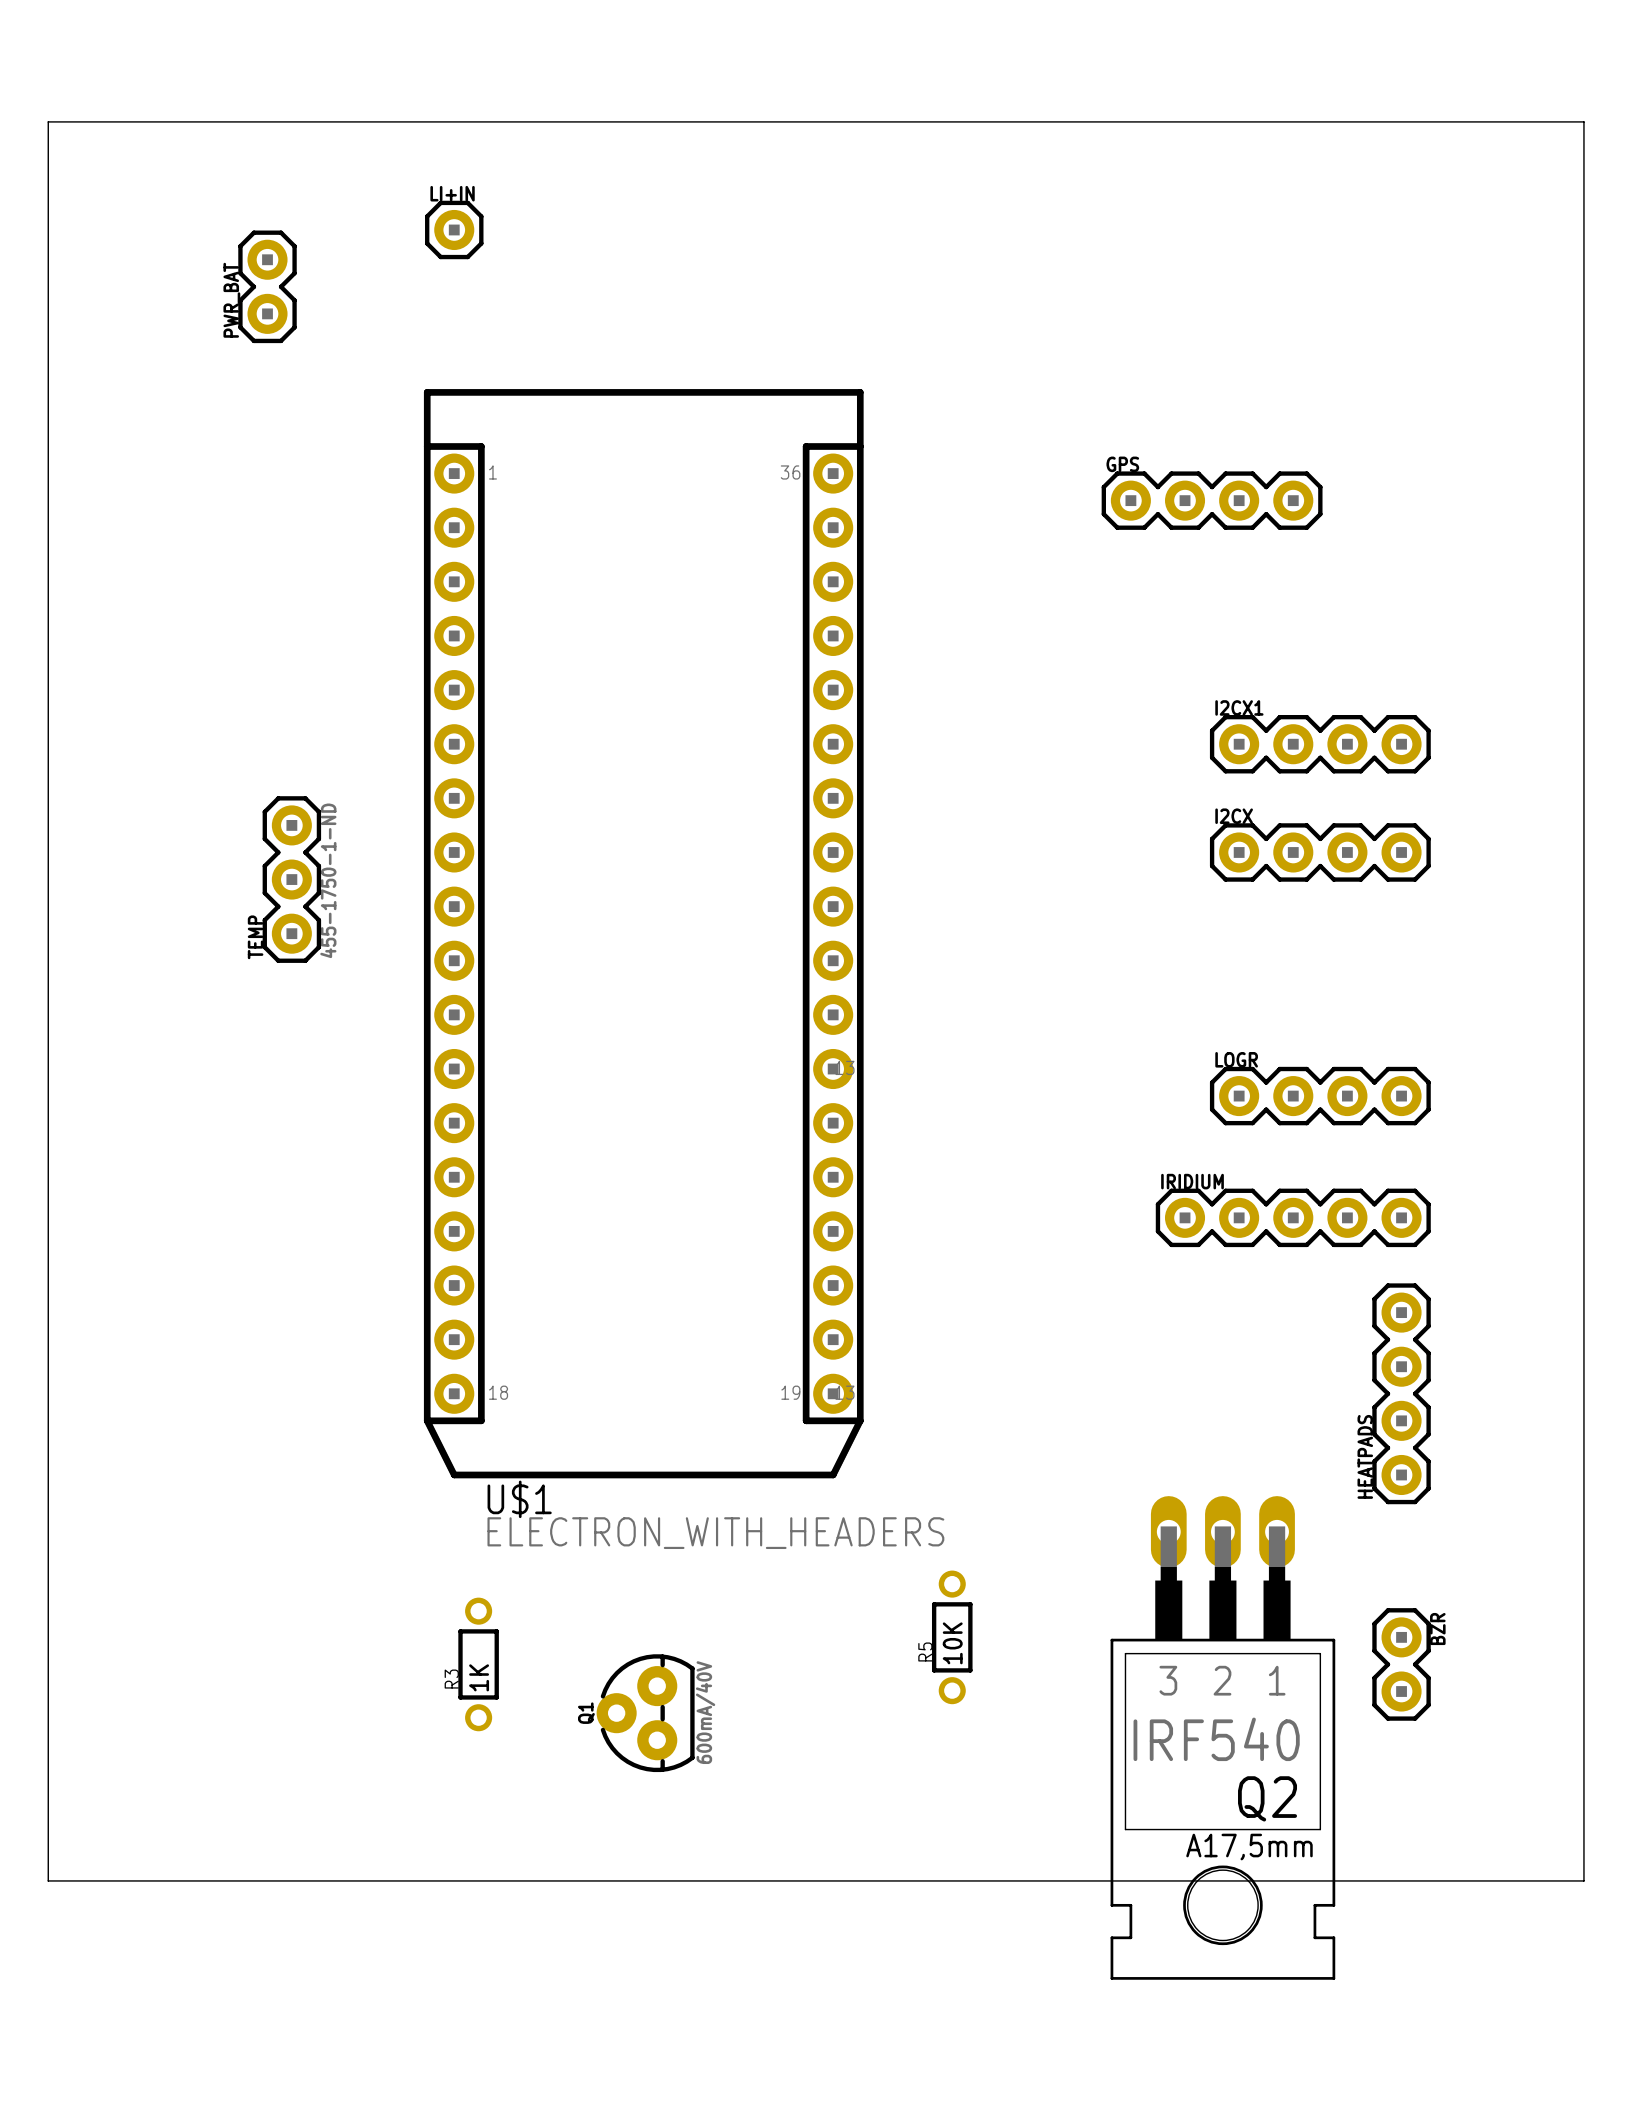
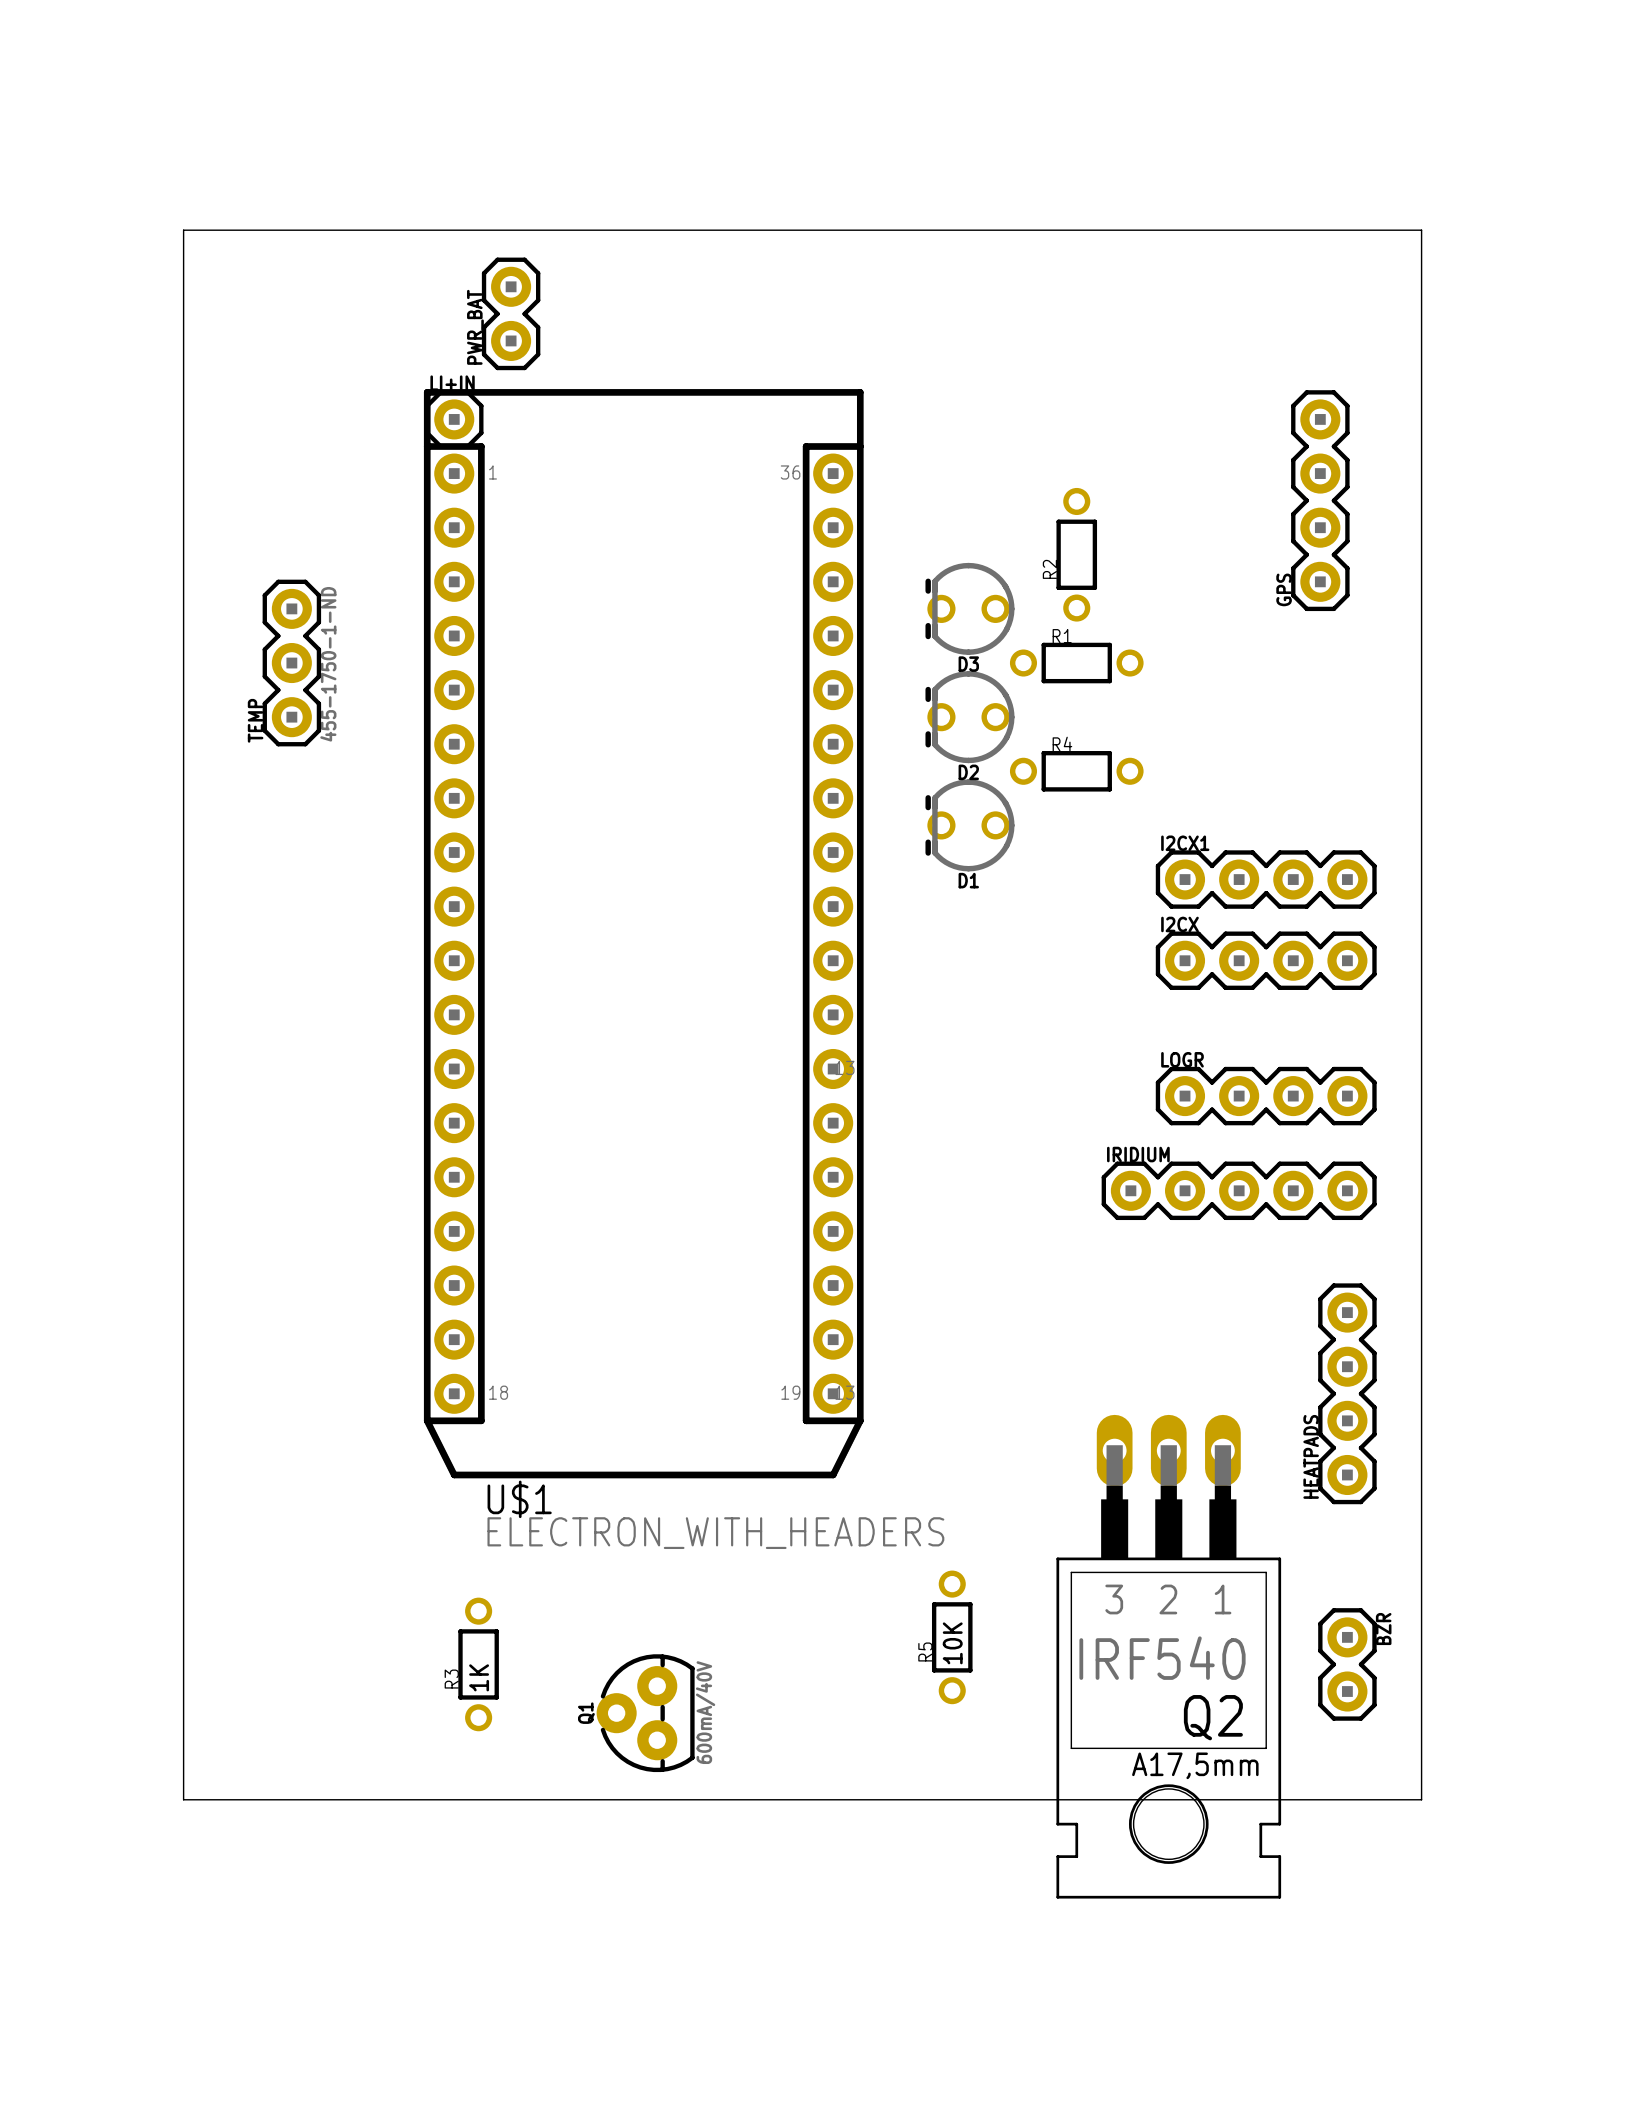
board edge: (48, 121) (1583, 121) (1583, 1880) (48, 1880) (48, 121) -> (183, 230) (183, 1799) (1421, 1799) (1421, 230) (183, 230)
LI+IN position: (454, 229) -> (454, 419)
PWR_BAT position: (267, 286) -> (511, 313)
GPS name position: GPS (1122, 464) -> GPS (1284, 589)
GPS rotation: 0° (1212, 500) -> 90° clockwise (1320, 500)
R2: none -> (1076, 554)
D3: none -> (969, 608)
R1: none -> (1076, 663)
D2: none -> (969, 717)
I2CX1 position: (1320, 744) -> (1266, 879)
R4: none -> (1076, 771)
D1: none -> (969, 825)
I2CX position: (1320, 852) -> (1266, 960)
TEMP position: (291, 879) -> (291, 663)
LOGR position: (1320, 1096) -> (1266, 1096)
IRIDIUM position: (1293, 1217) -> (1239, 1190)
HEATPADS position: (1401, 1393) -> (1347, 1393)
BZR position: (1401, 1664) -> (1347, 1664)
Q2 position: (1222, 1737) -> (1168, 1656)

